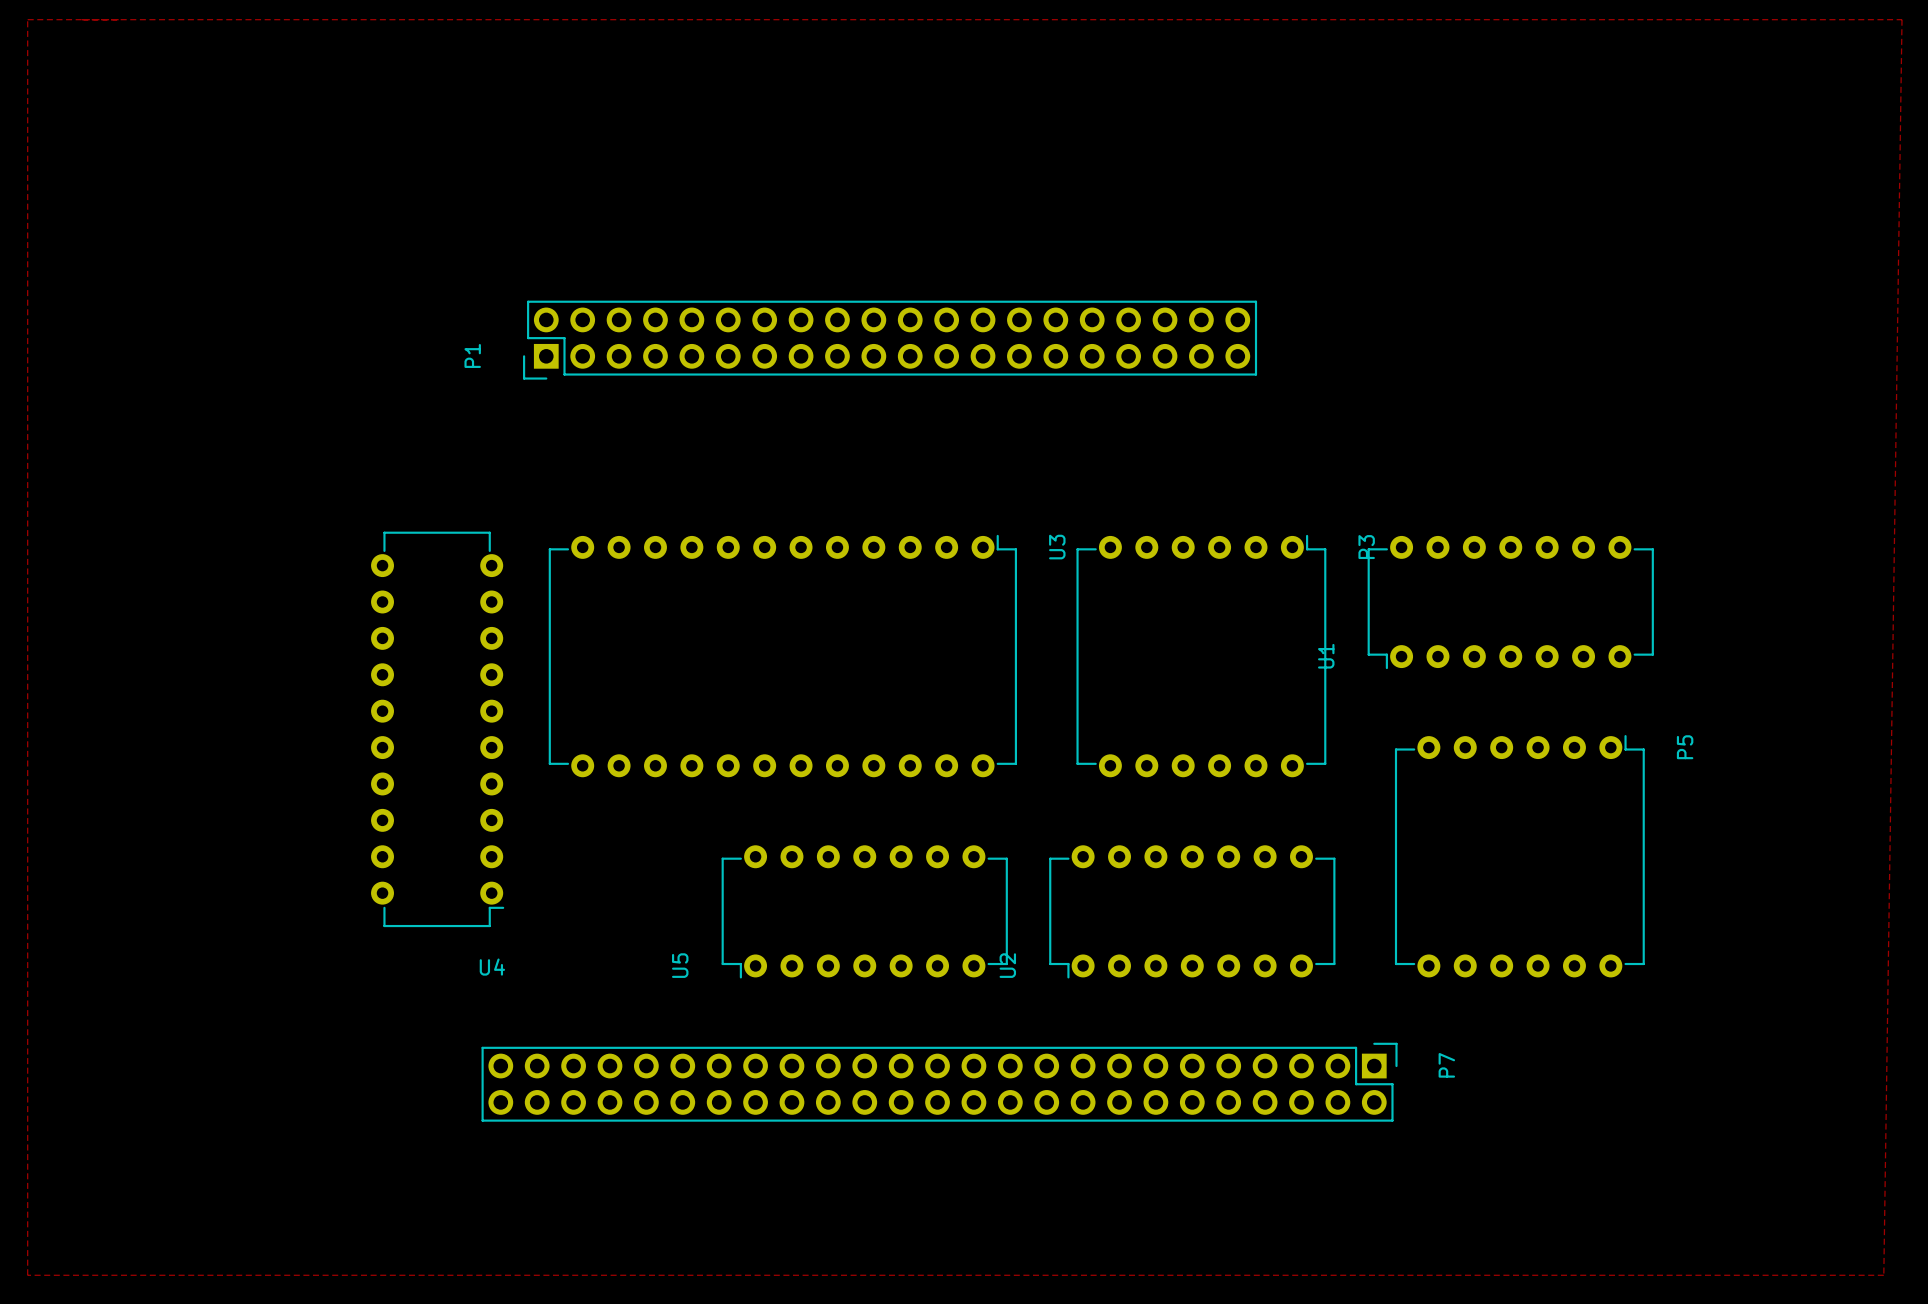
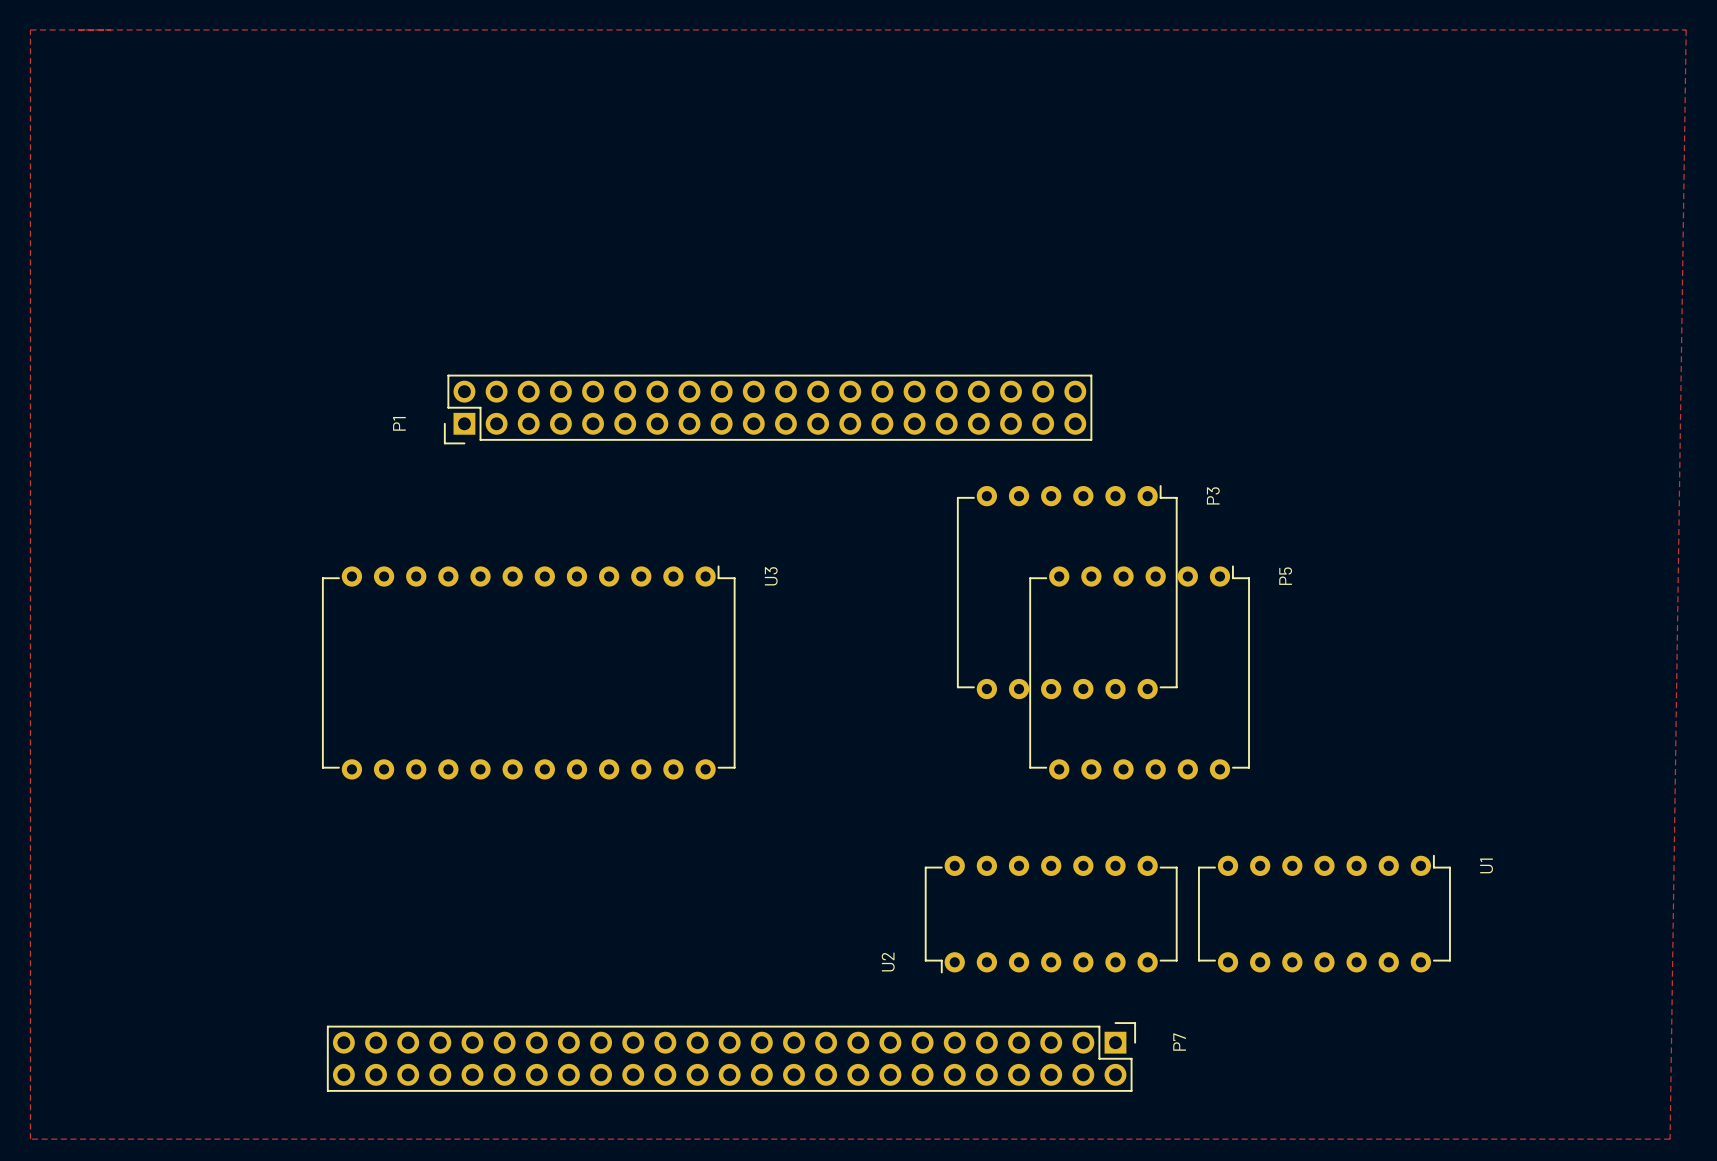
P1 position: (890, 340) -> (768, 409)
U1 rotation: 0° (1510, 602) -> 180° (1324, 913)
U1 position: (1510, 602) -> (1324, 913)
U3 position: (782, 656) -> (528, 672)
U4: (437, 729) -> none
P5 position: (1519, 856) -> (1139, 672)
U5: (864, 911) -> none
U2 position: (1192, 911) -> (1051, 914)
P7 position: (939, 1082) -> (731, 1056)

